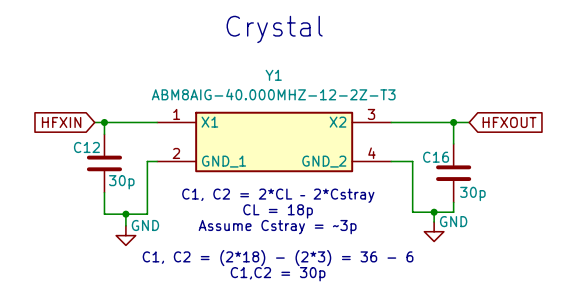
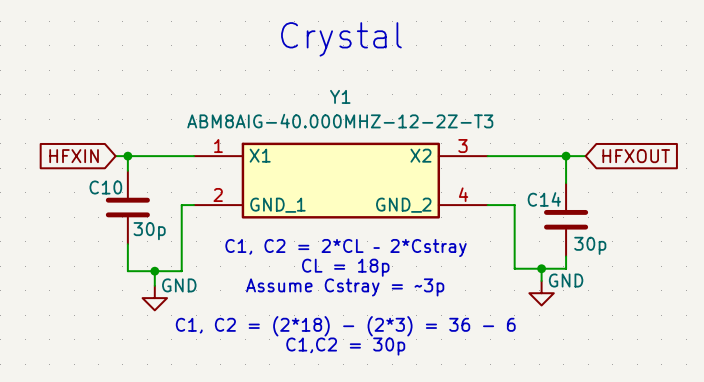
C12 name: C12 (86, 147) -> C10 (105, 187)
C16 name: C16 (436, 157) -> C14 (544, 199)

